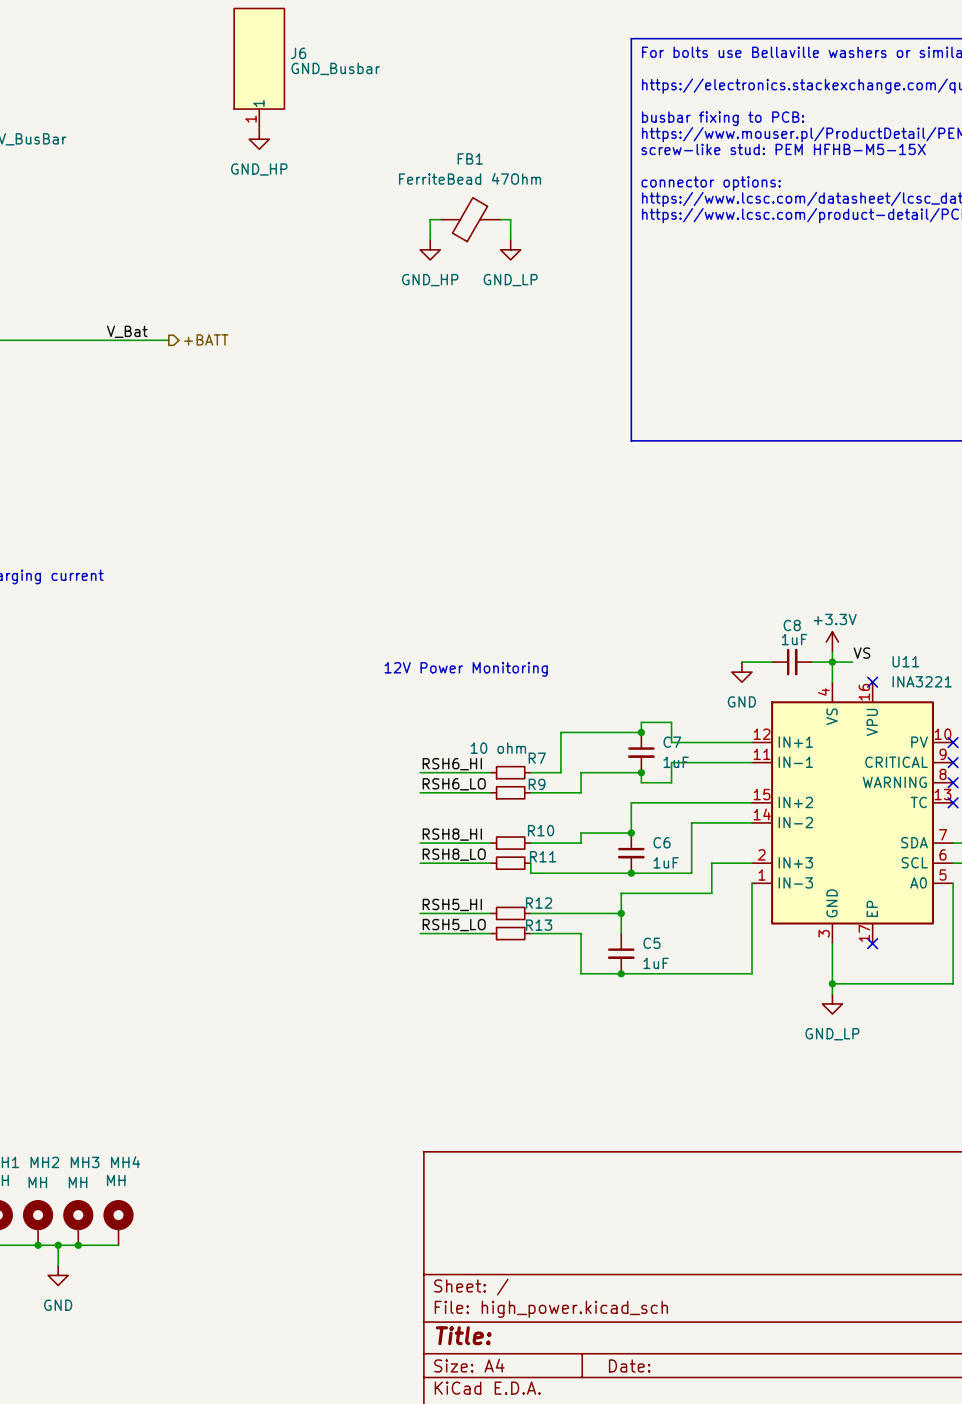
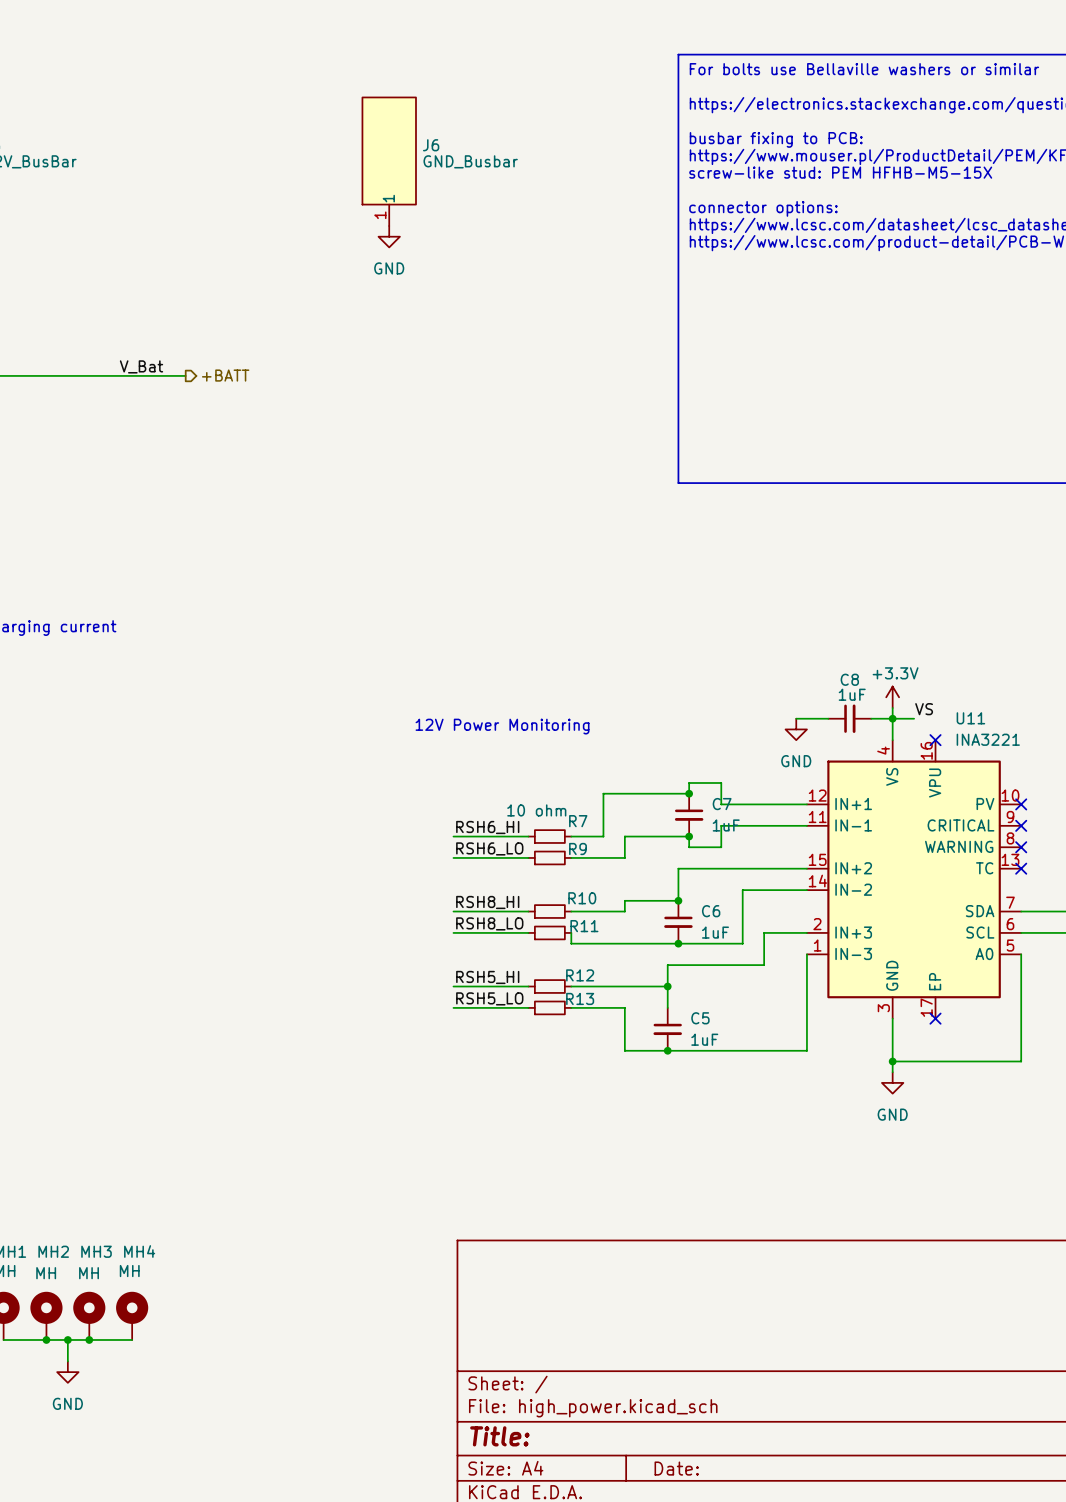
J6 position: (259, 68) -> (389, 161)
power symbol: GND_HP (259, 139) -> none
power symbol: none -> GND (389, 236)
wire: (440, 219) (430, 219) (430, 239) -> none
FB1: FerriteBead 47Ohm (470, 219) -> none
wire: (500, 219) (510, 219) (510, 239) -> none
power symbol: GND_HP (430, 249) -> none
power symbol: GND_LP (510, 249) -> none
power symbol: GND_LP (832, 1003) -> GND (892, 1082)

